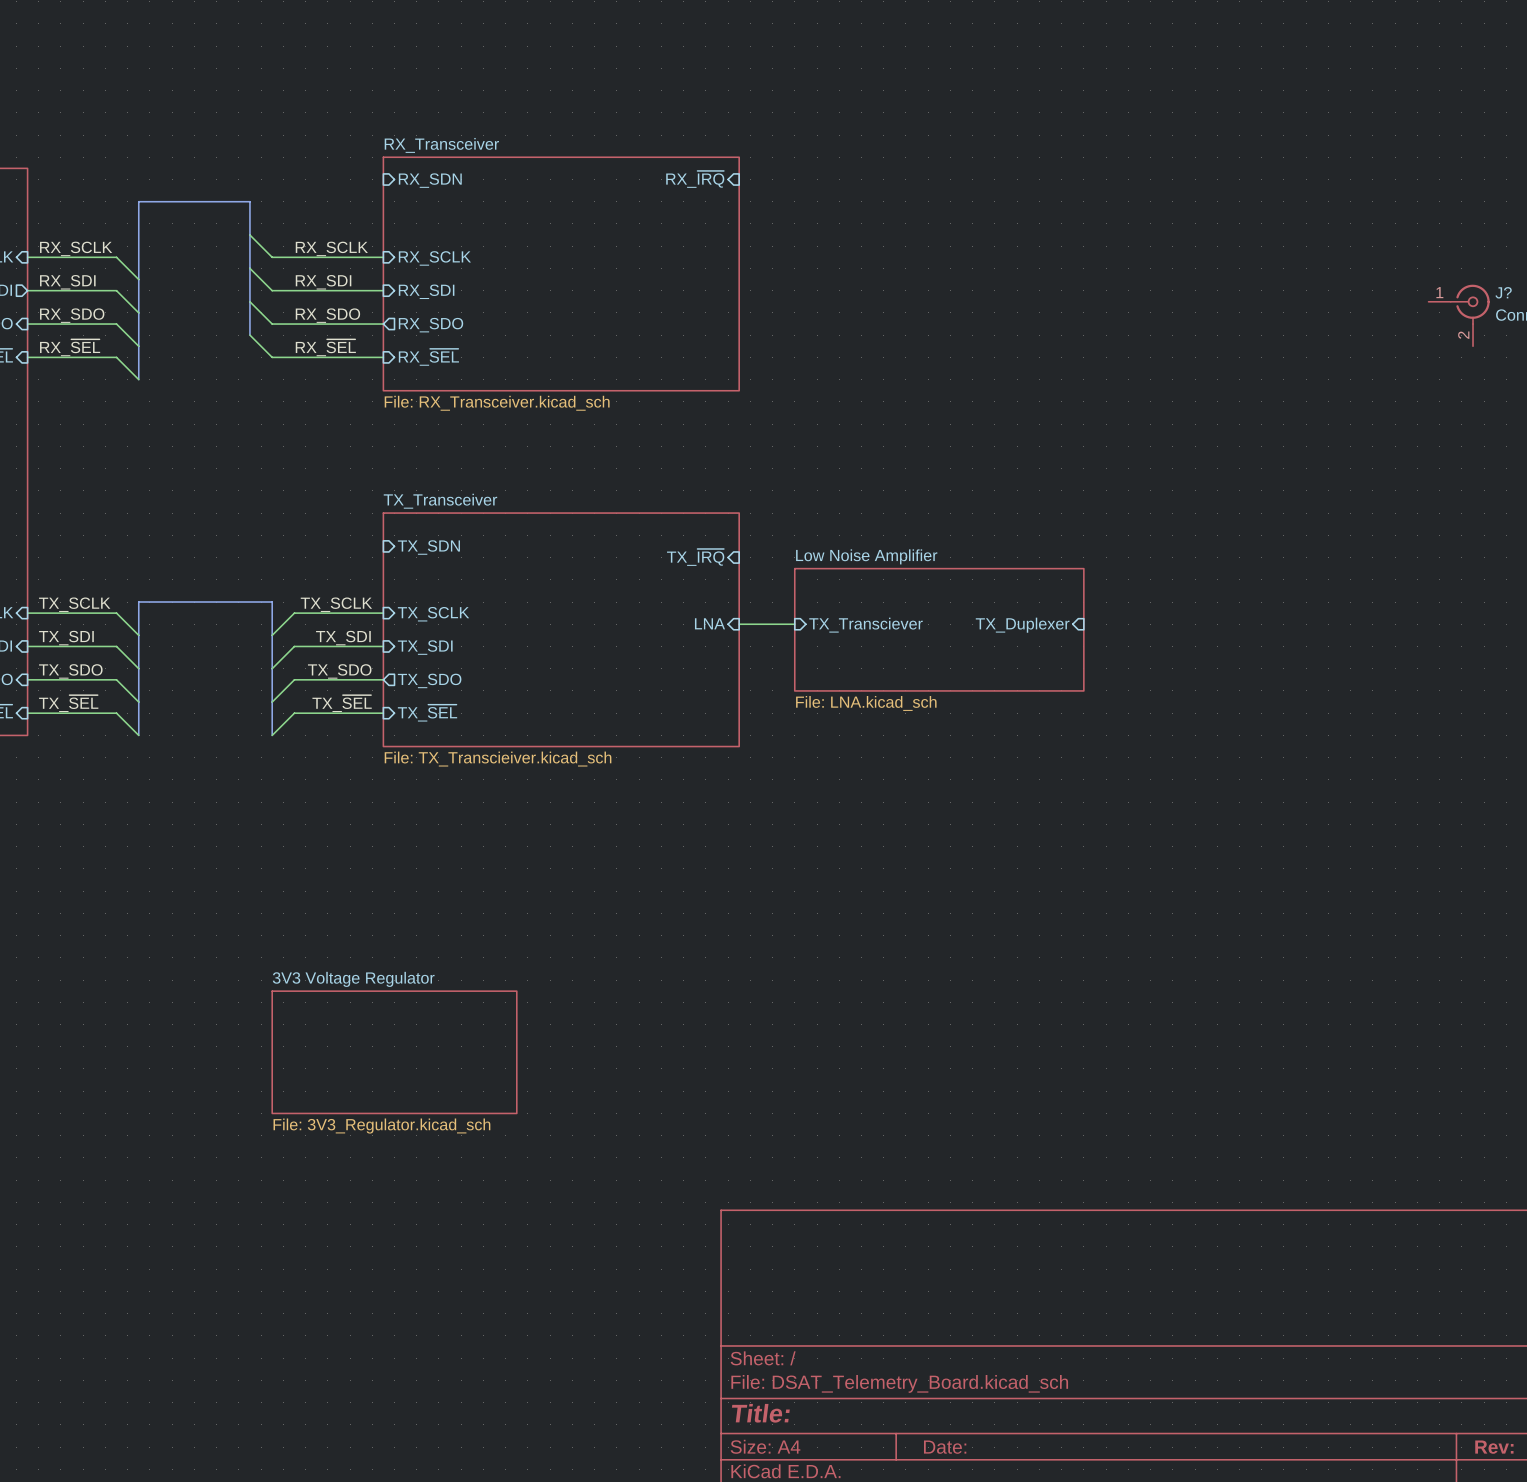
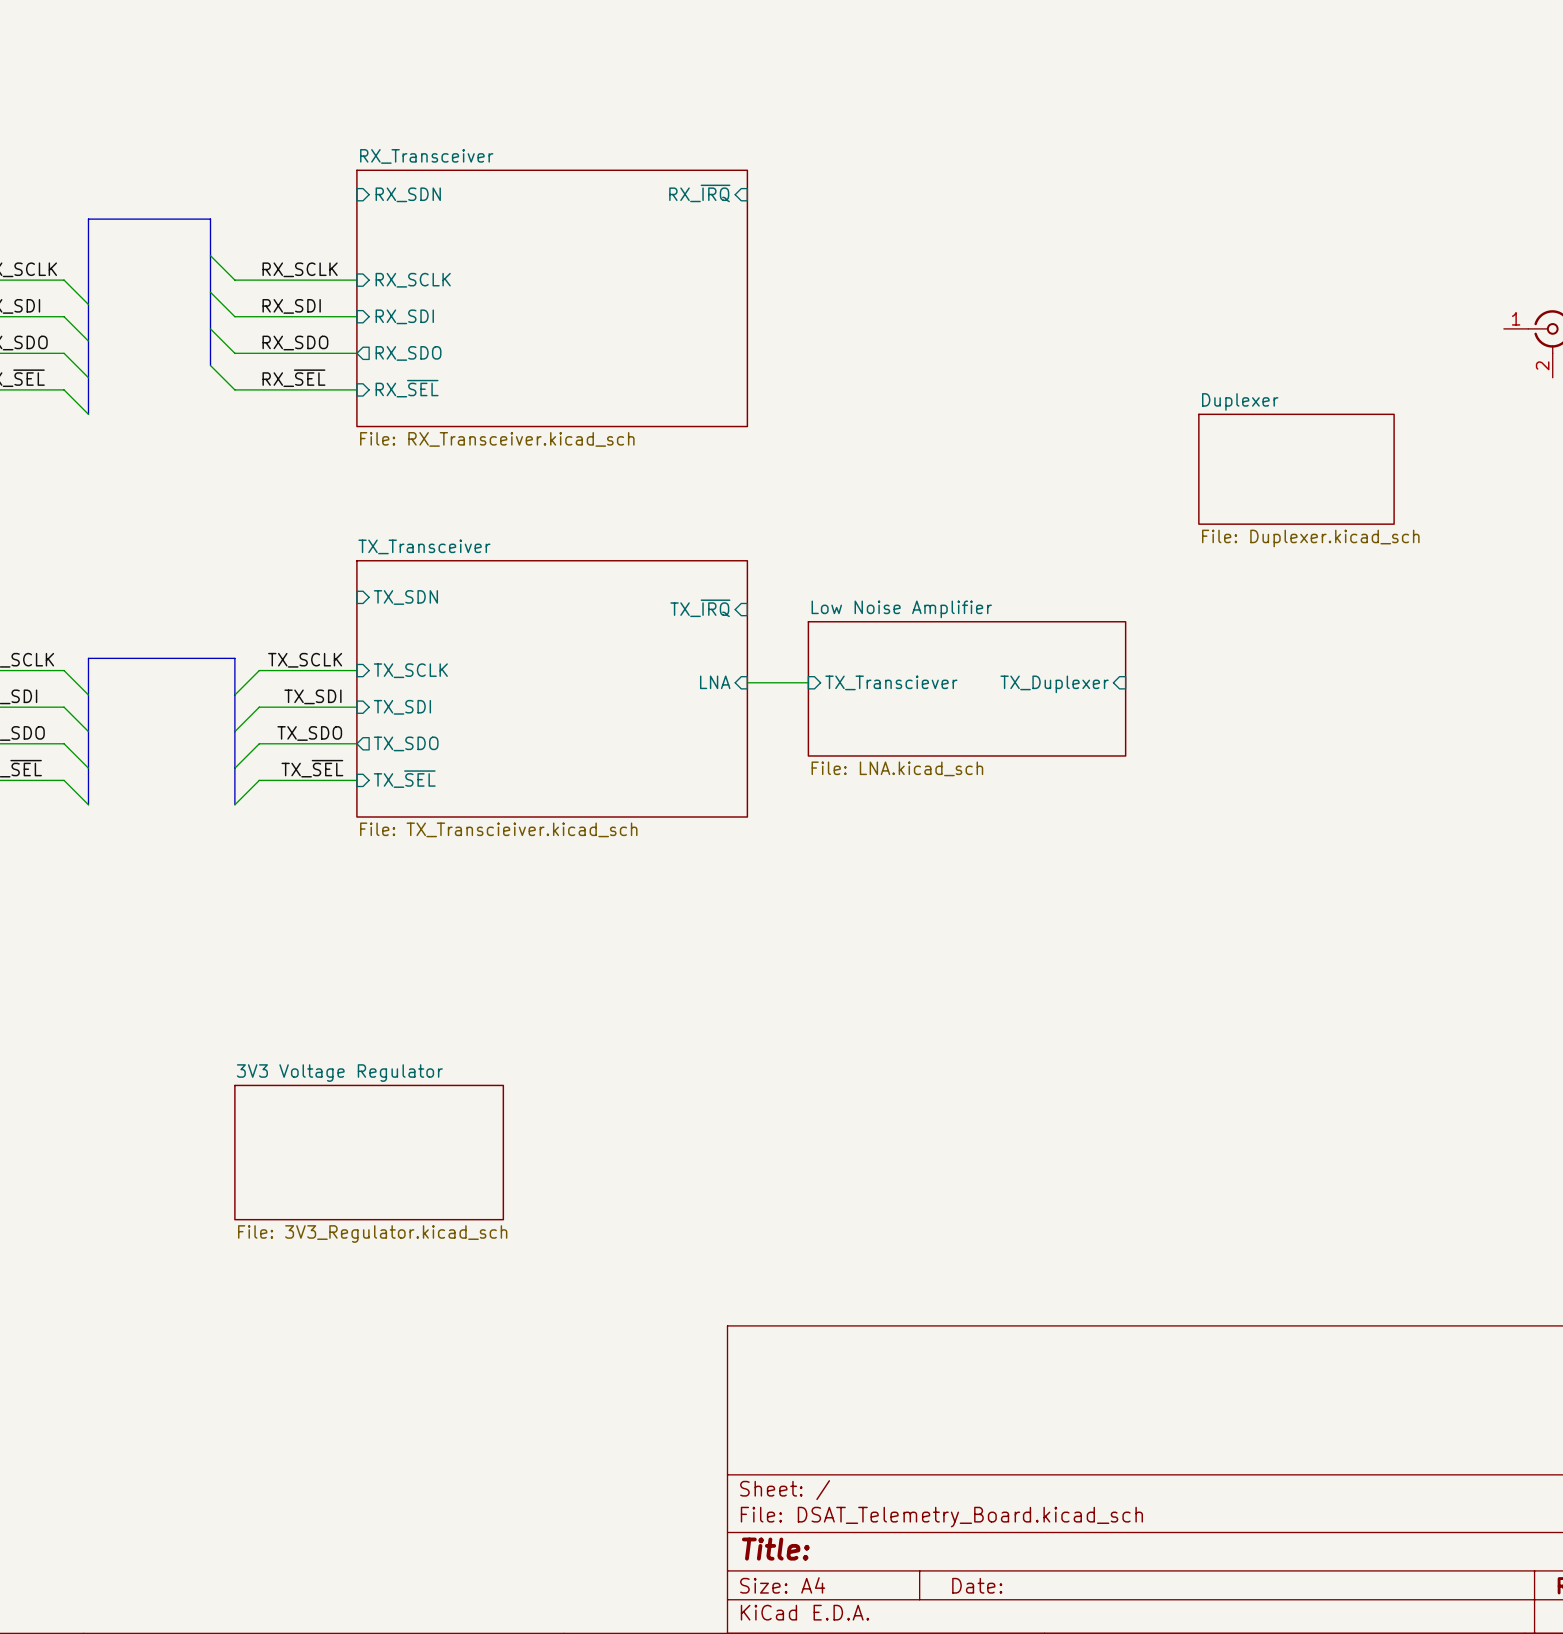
sheet Duplexer: none -> File: Duplexer.kicad_sch (1296, 469)

